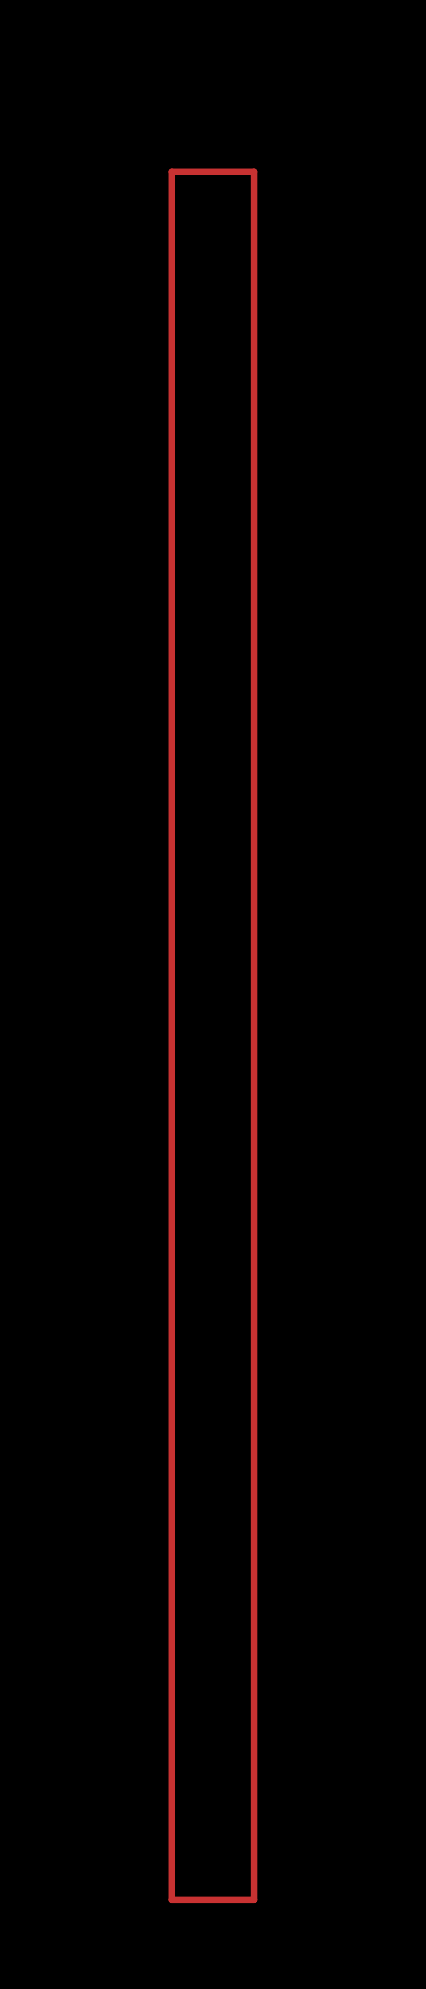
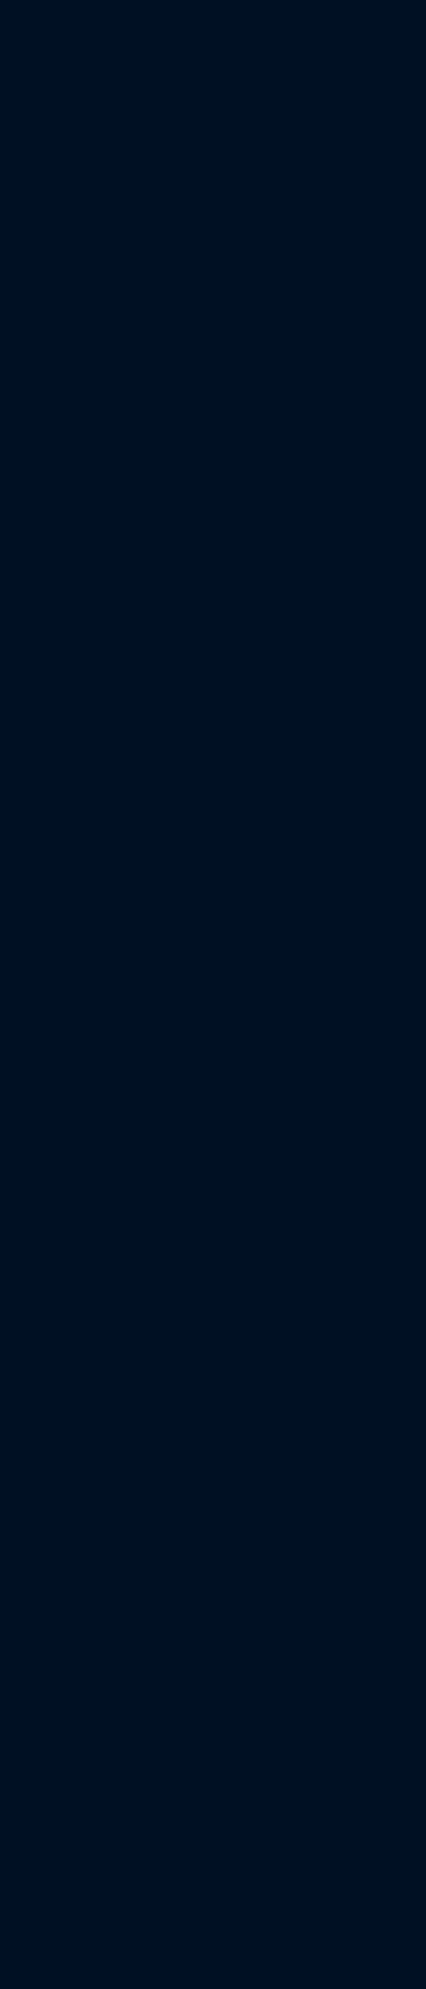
top track: (171, 171) (254, 171) (254, 1899) (171, 1899) (171, 171) -> none

